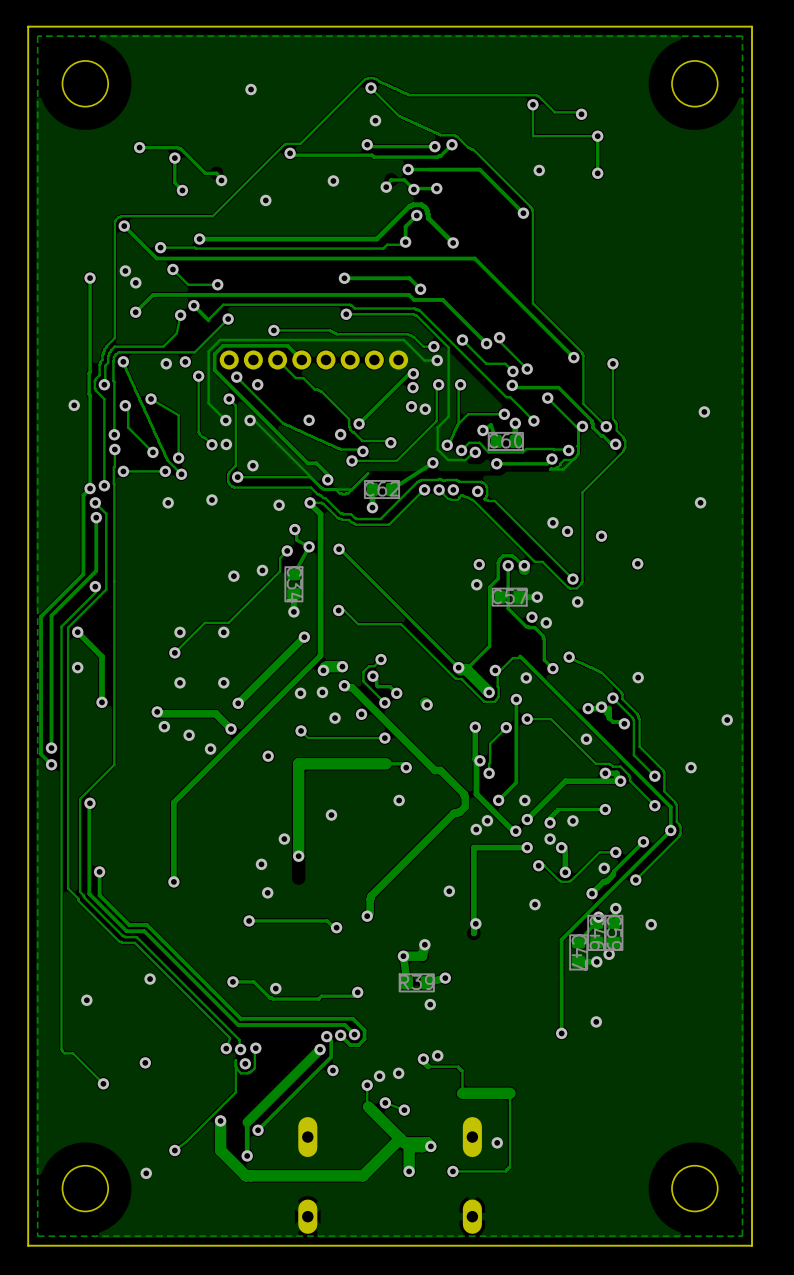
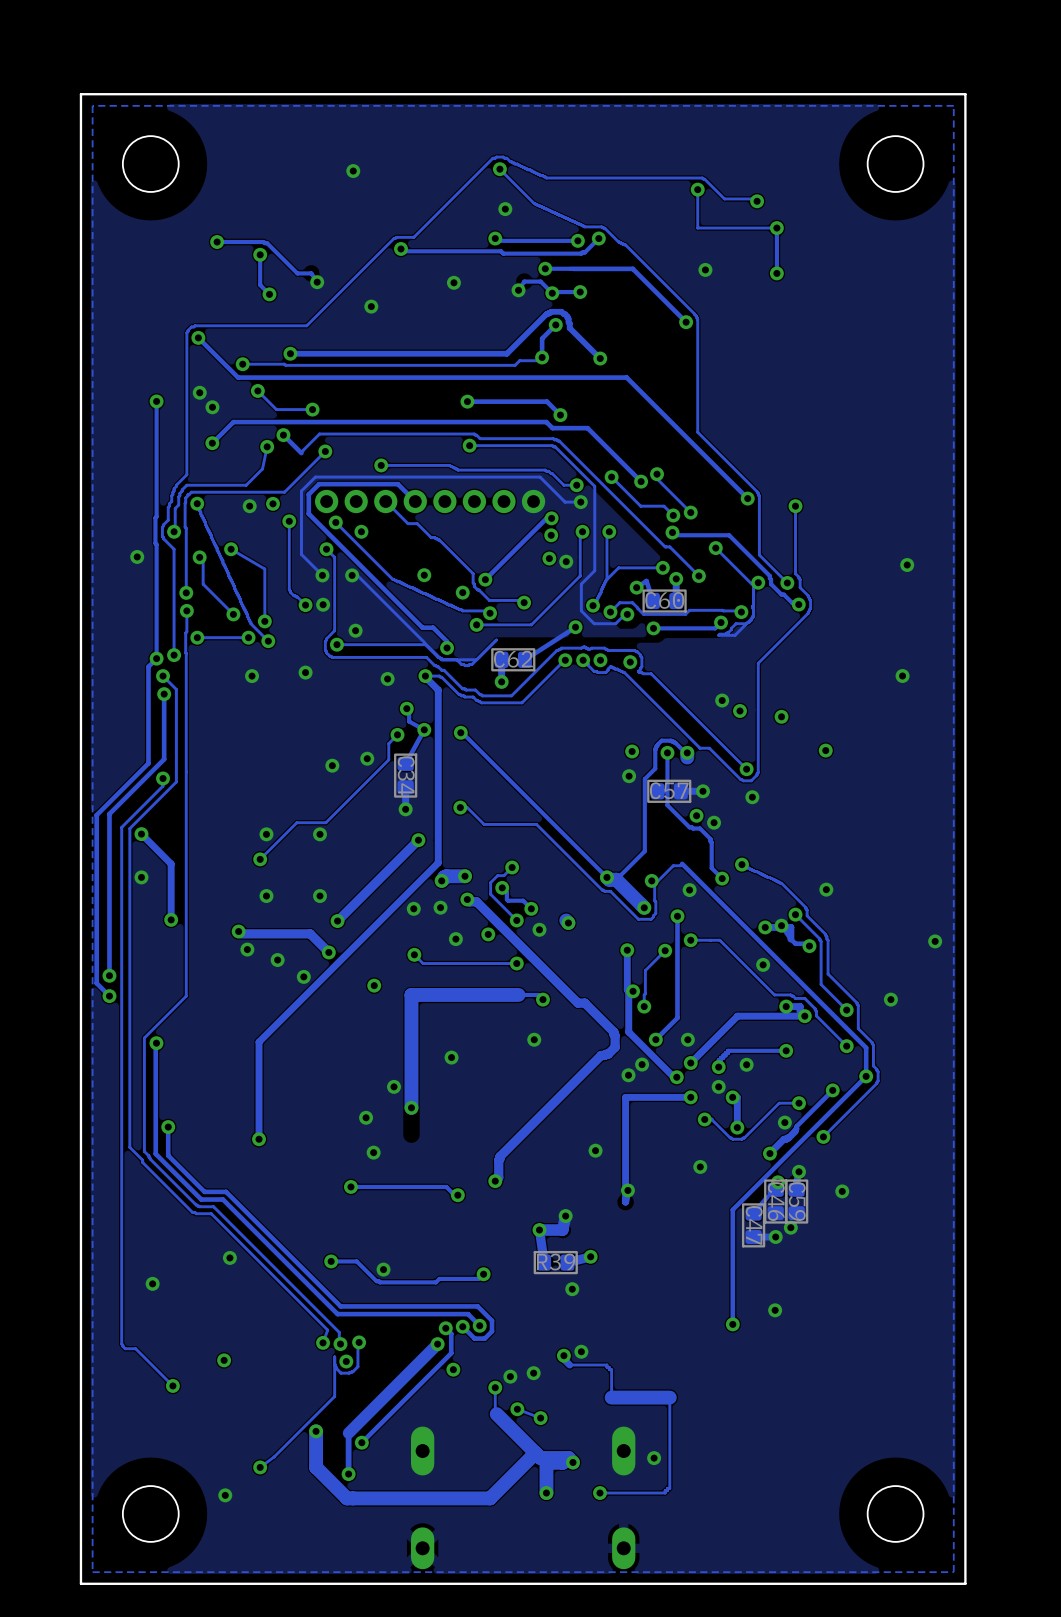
via: none -> (539, 929)

